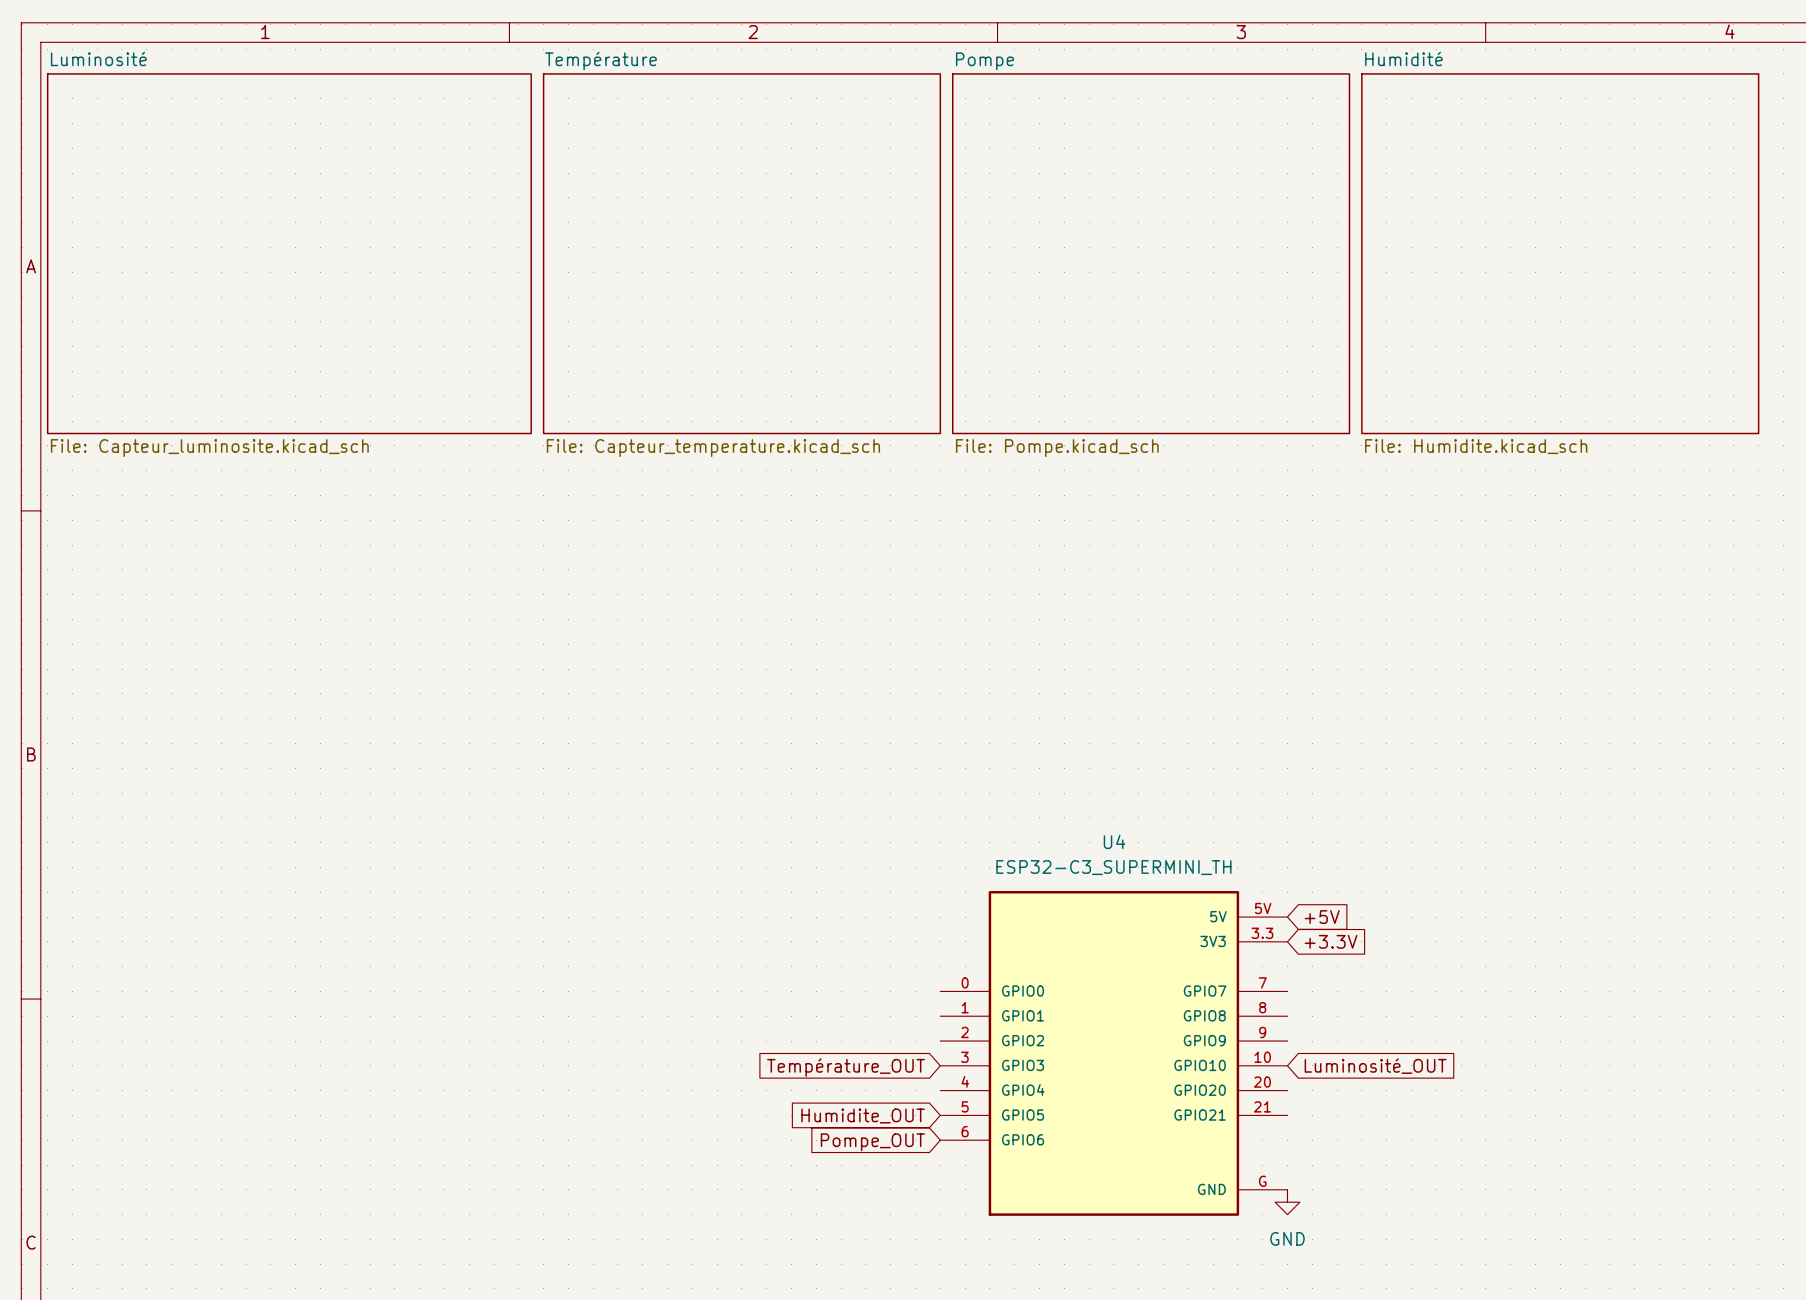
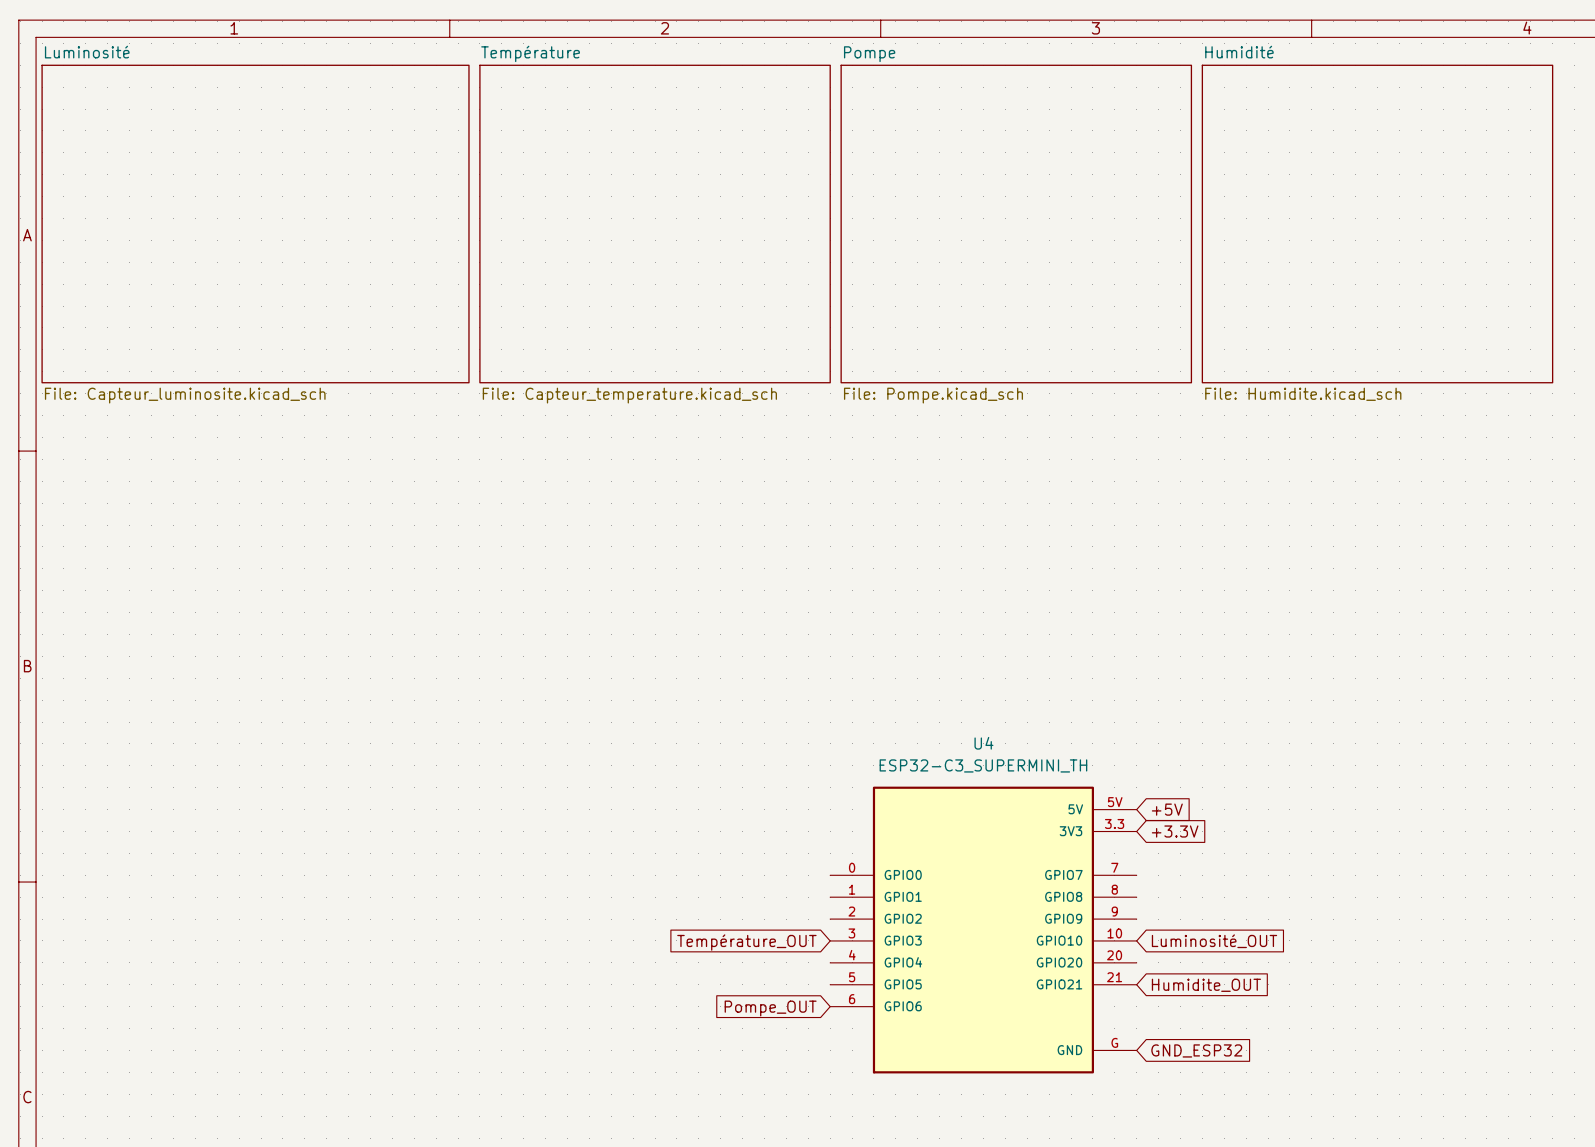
global label: Humidite_OUT (863, 1115) -> none
global label: none -> Humidite_OUT (1206, 985)
global label: none -> GND_ESP32 (1196, 1050)
power symbol: GND (1287, 1202) -> none

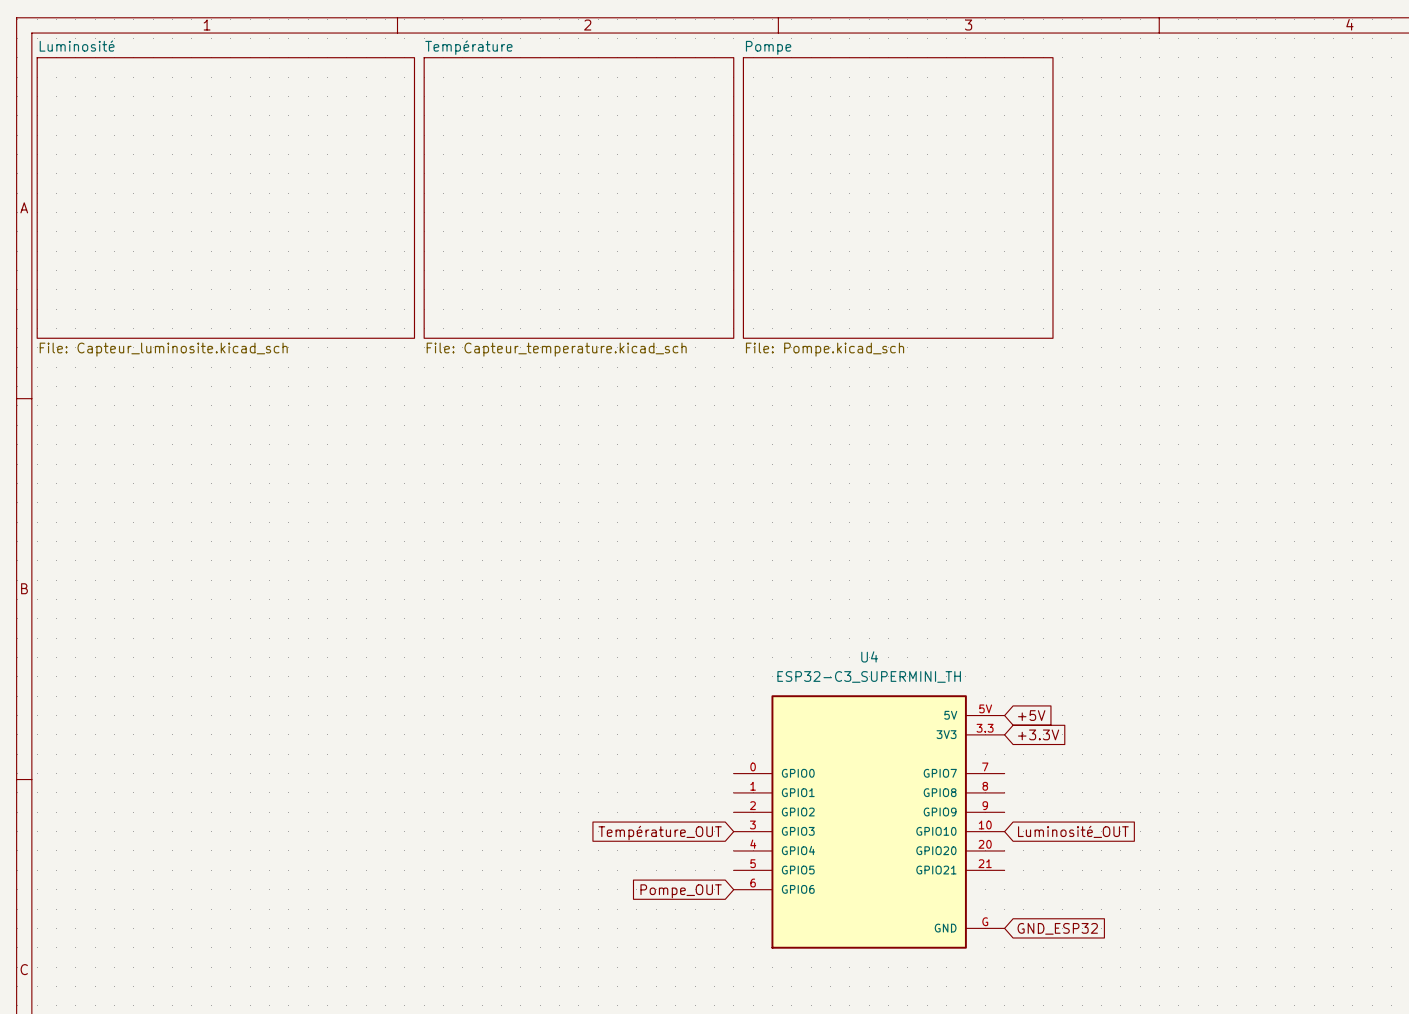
sheet Humidité: File: Humidite.kicad_sch (1377, 224) -> none
global label: Humidite_OUT (1206, 985) -> none

